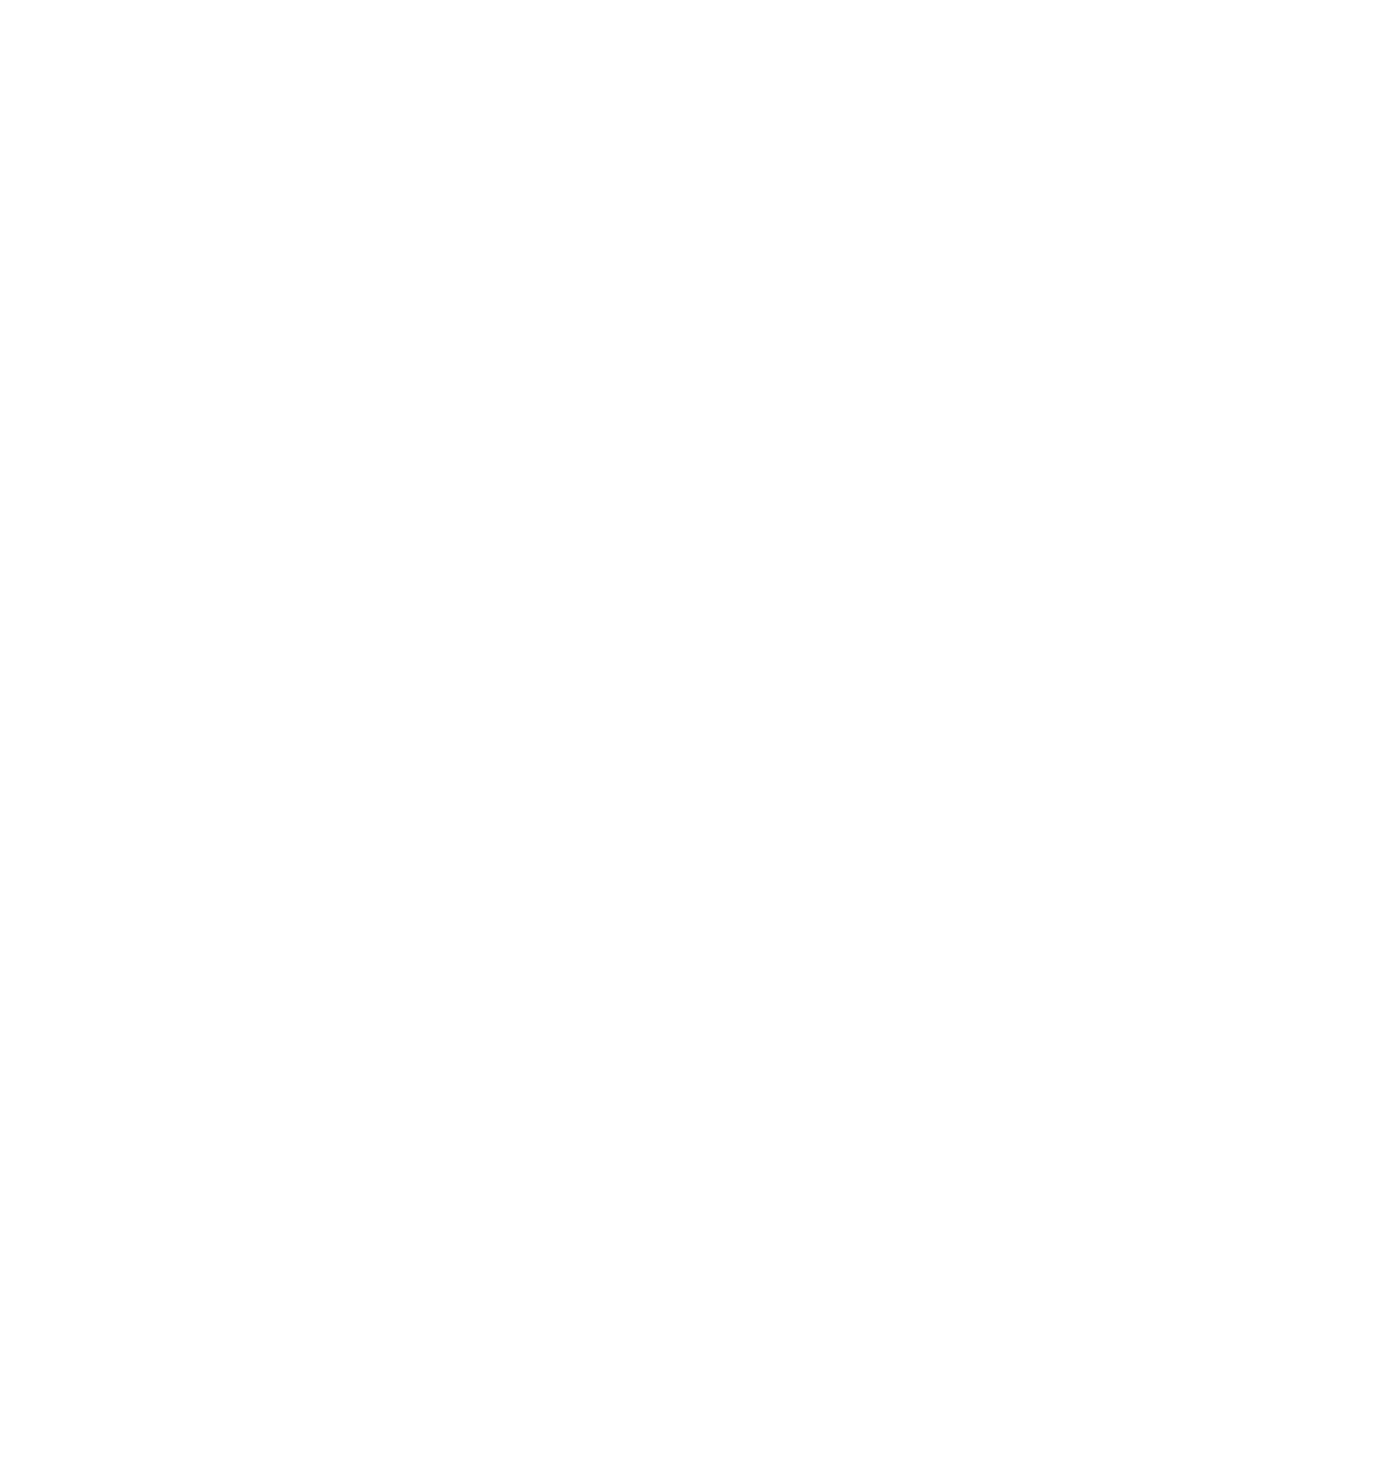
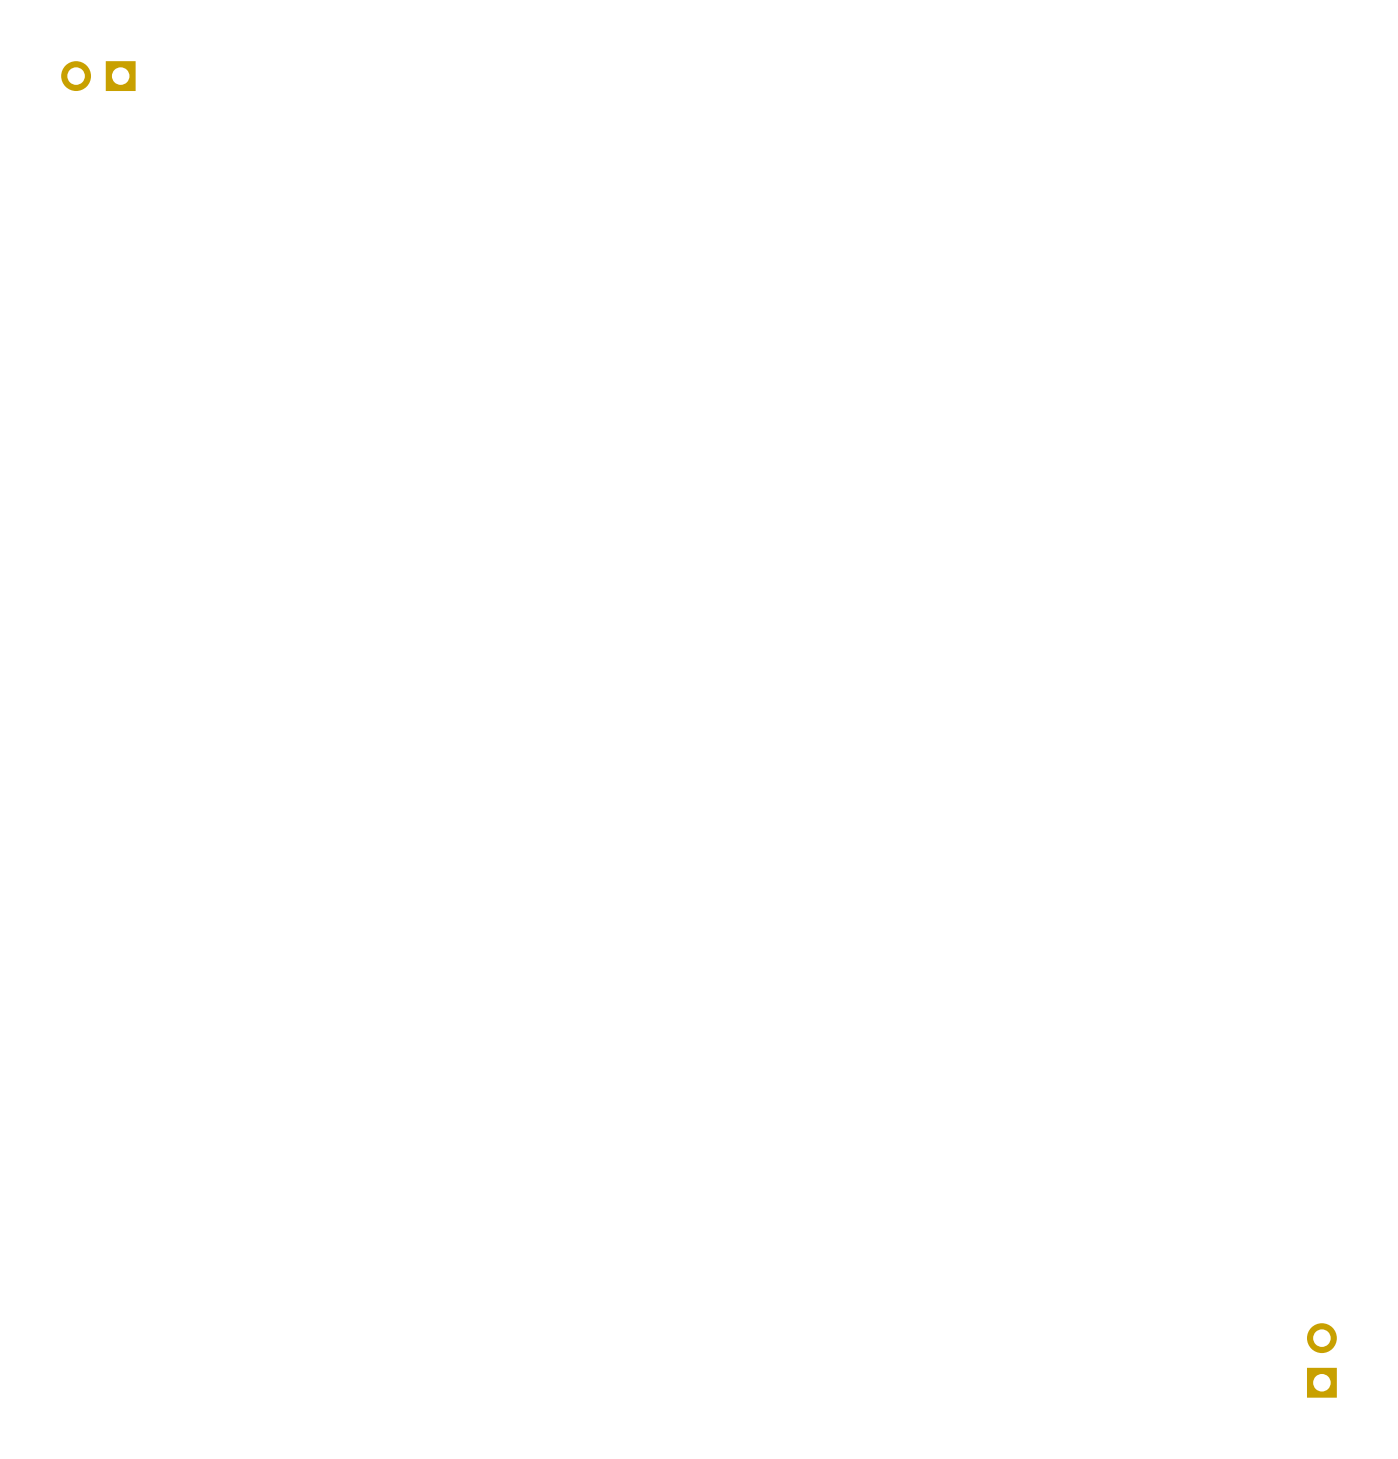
part: none -> (98, 76)
part: none -> (1321, 1360)

